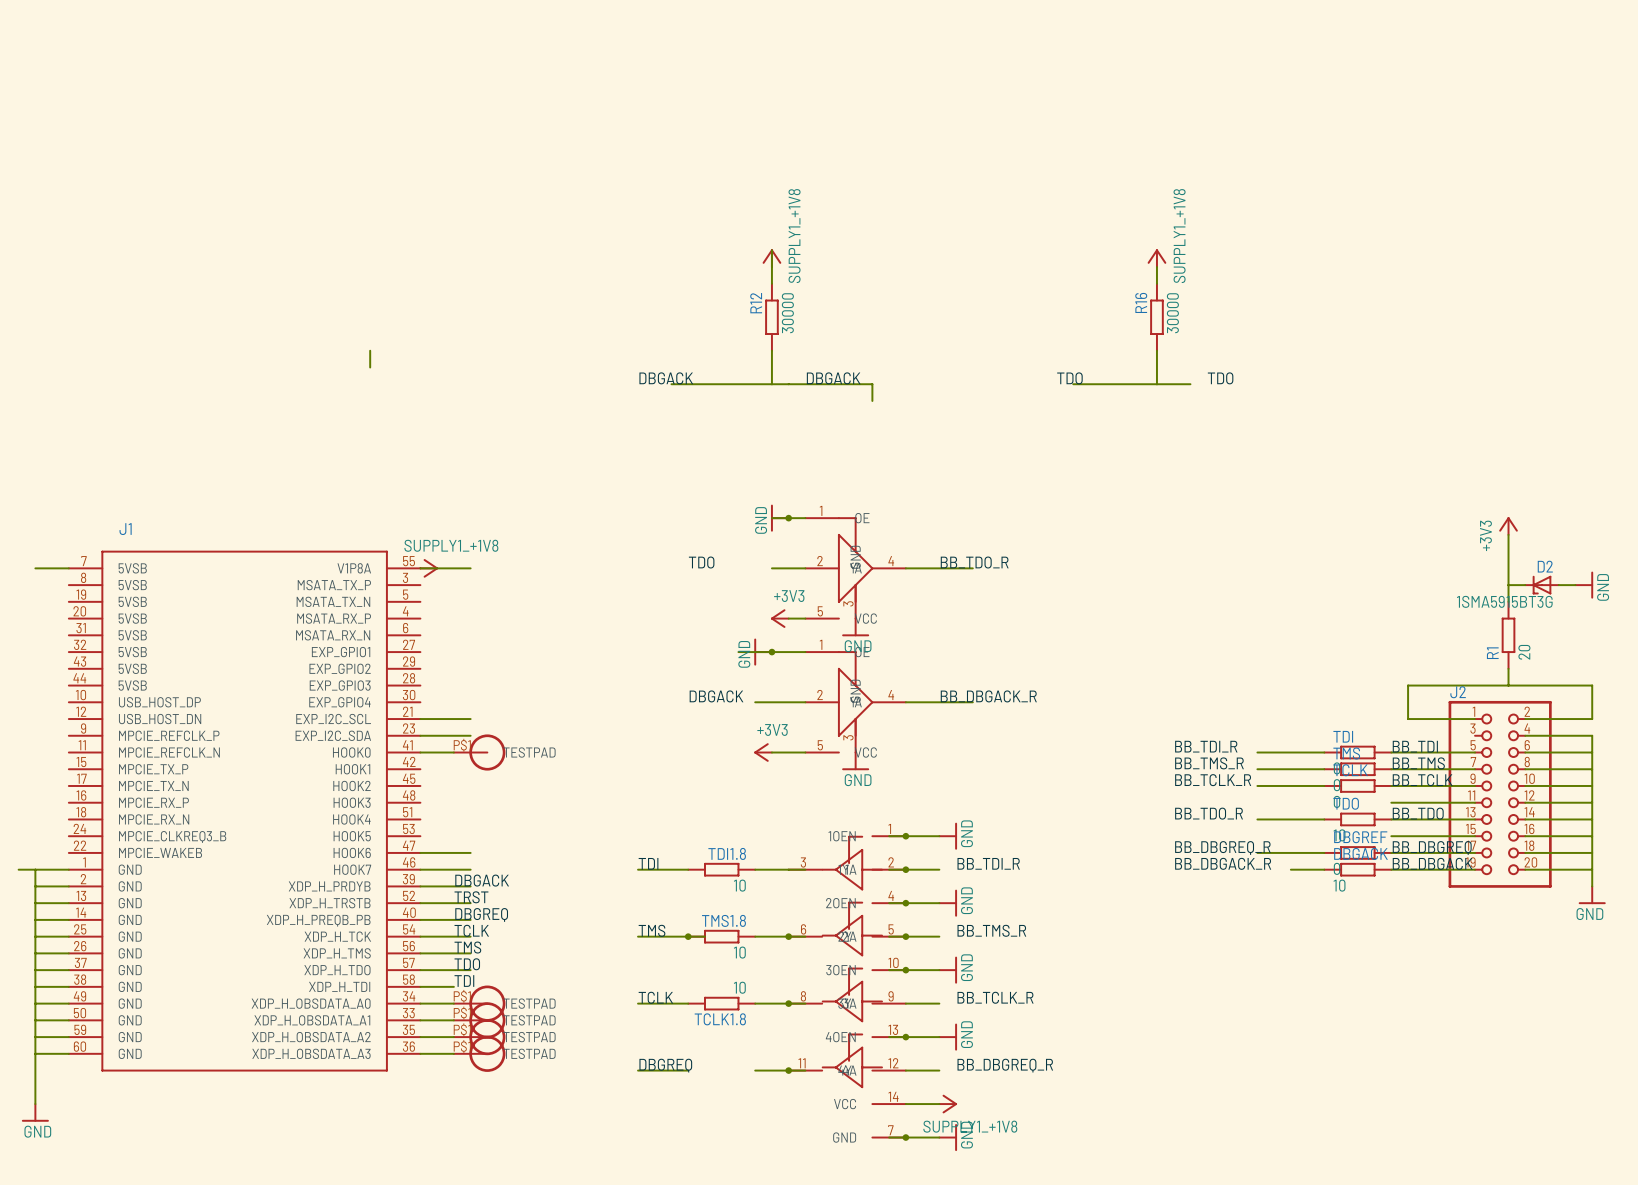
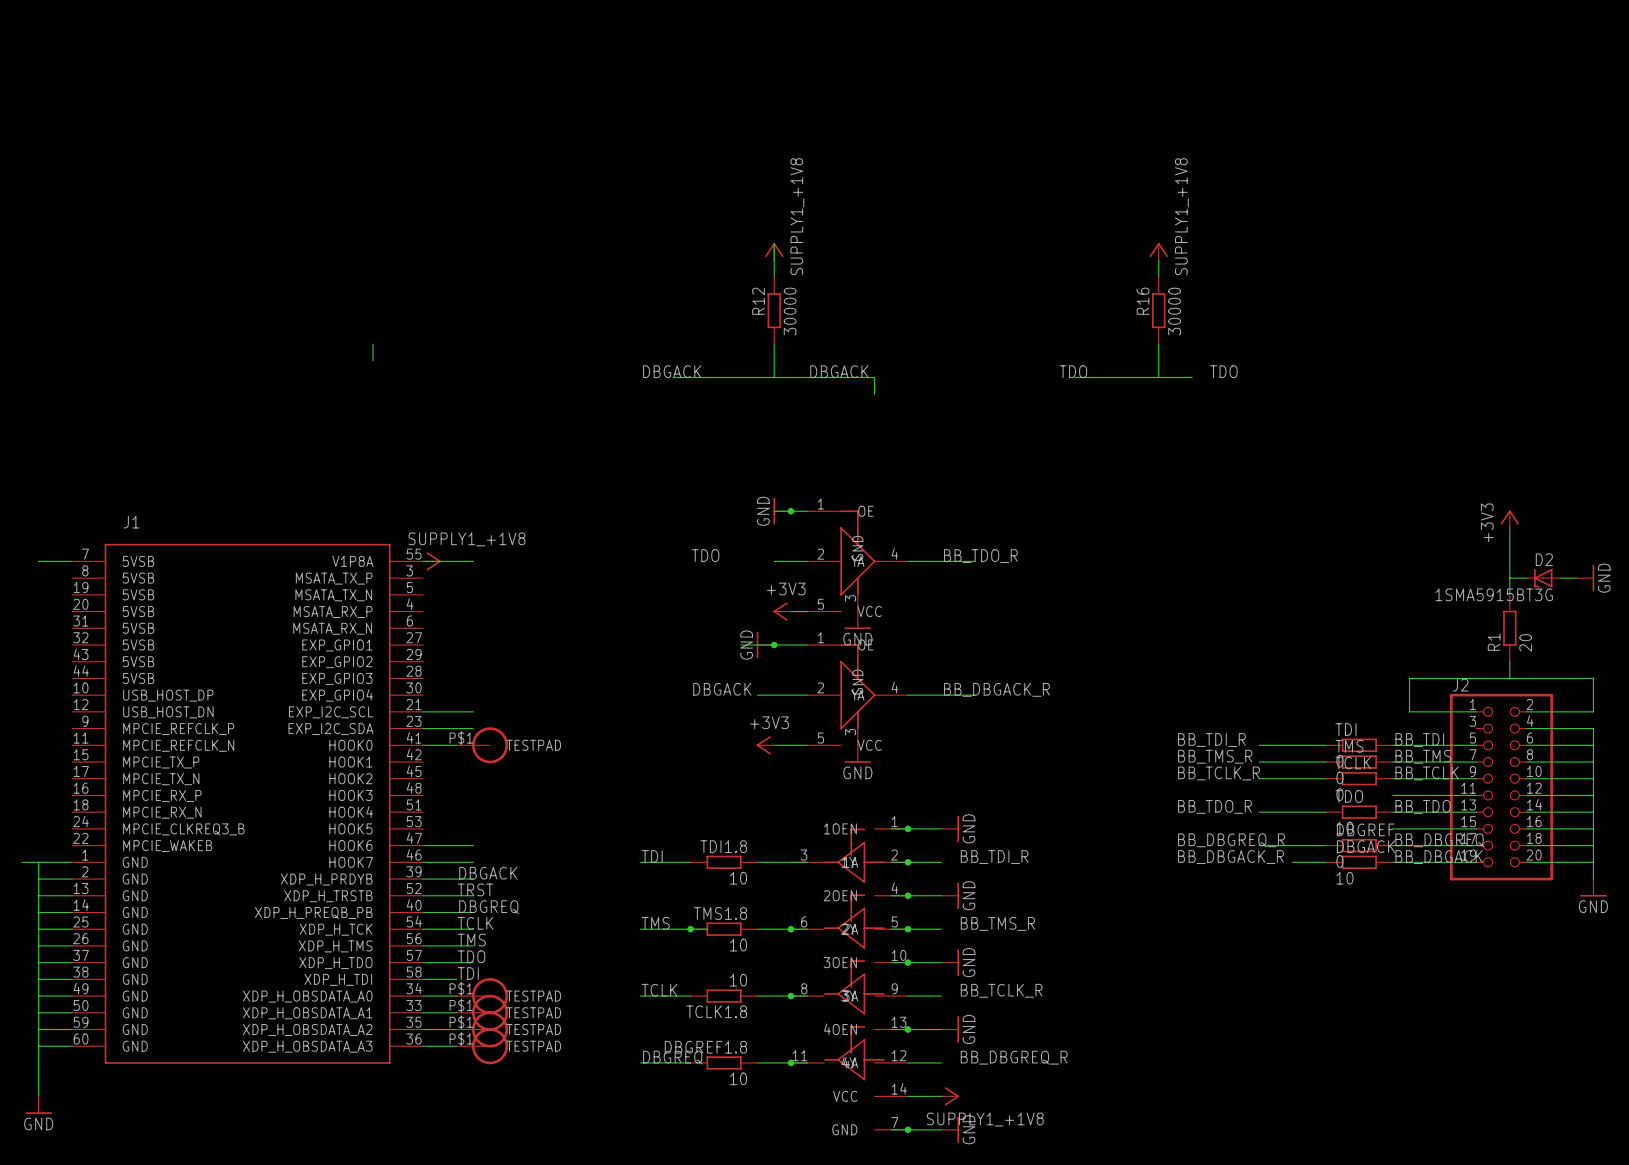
DBGREF1.8: none -> 10 (724, 1062)

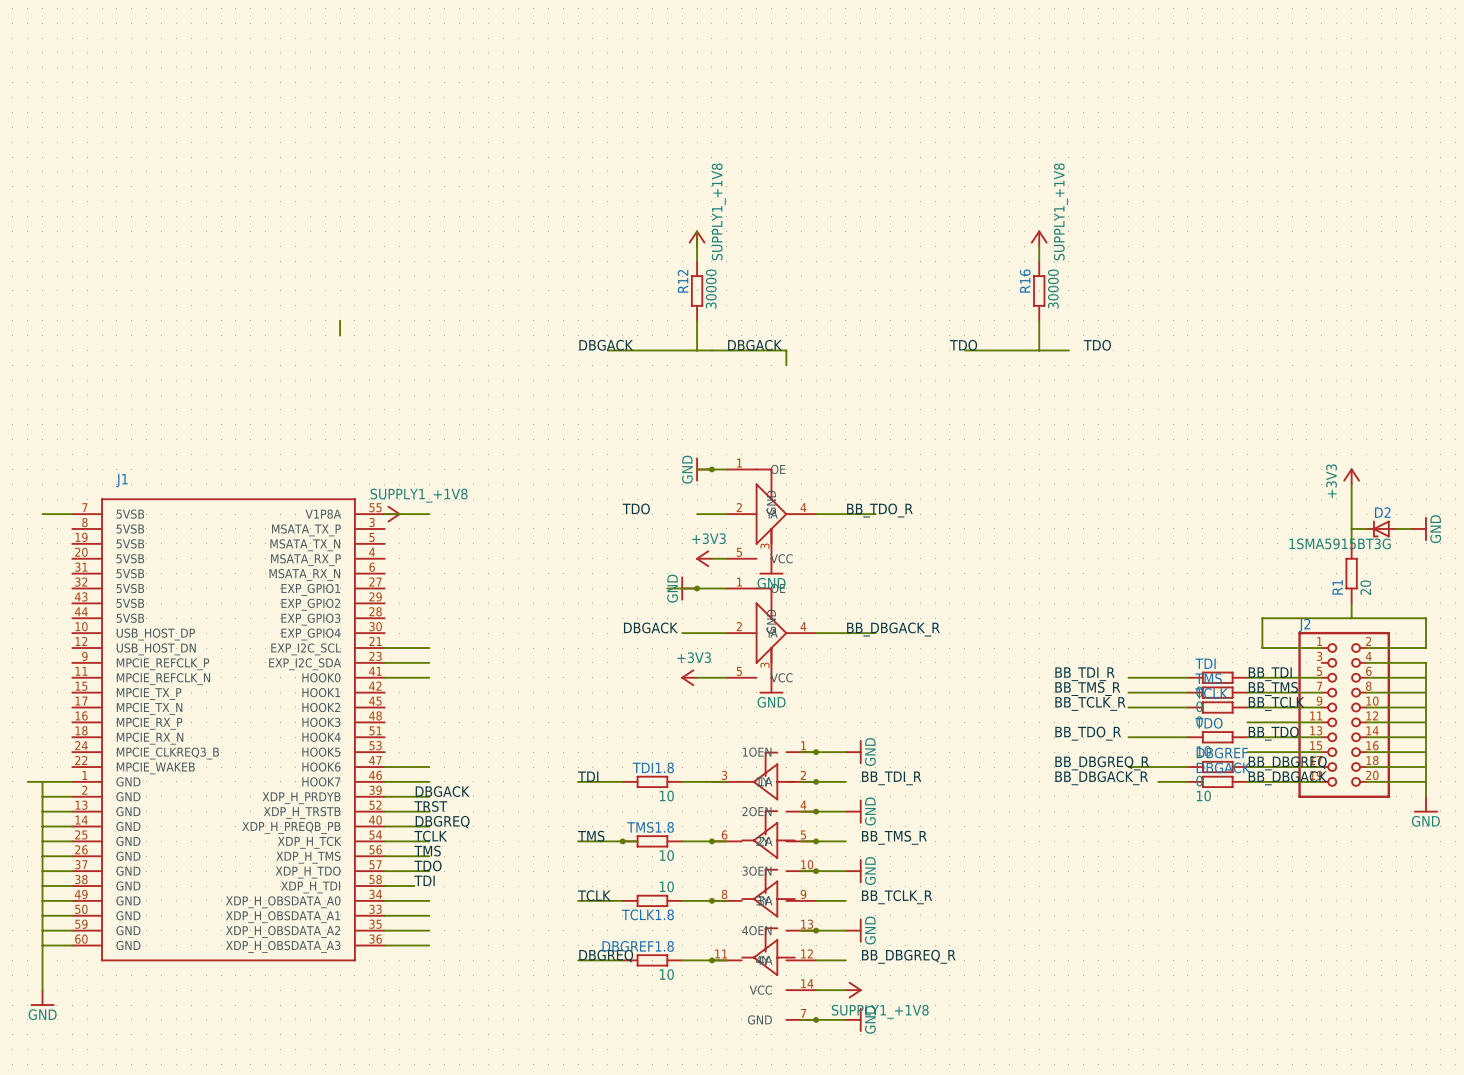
part: (482, 745) -> none
part: (482, 996) -> none
part: (482, 1012) -> none
part: (482, 1029) -> none
part: (482, 1046) -> none

